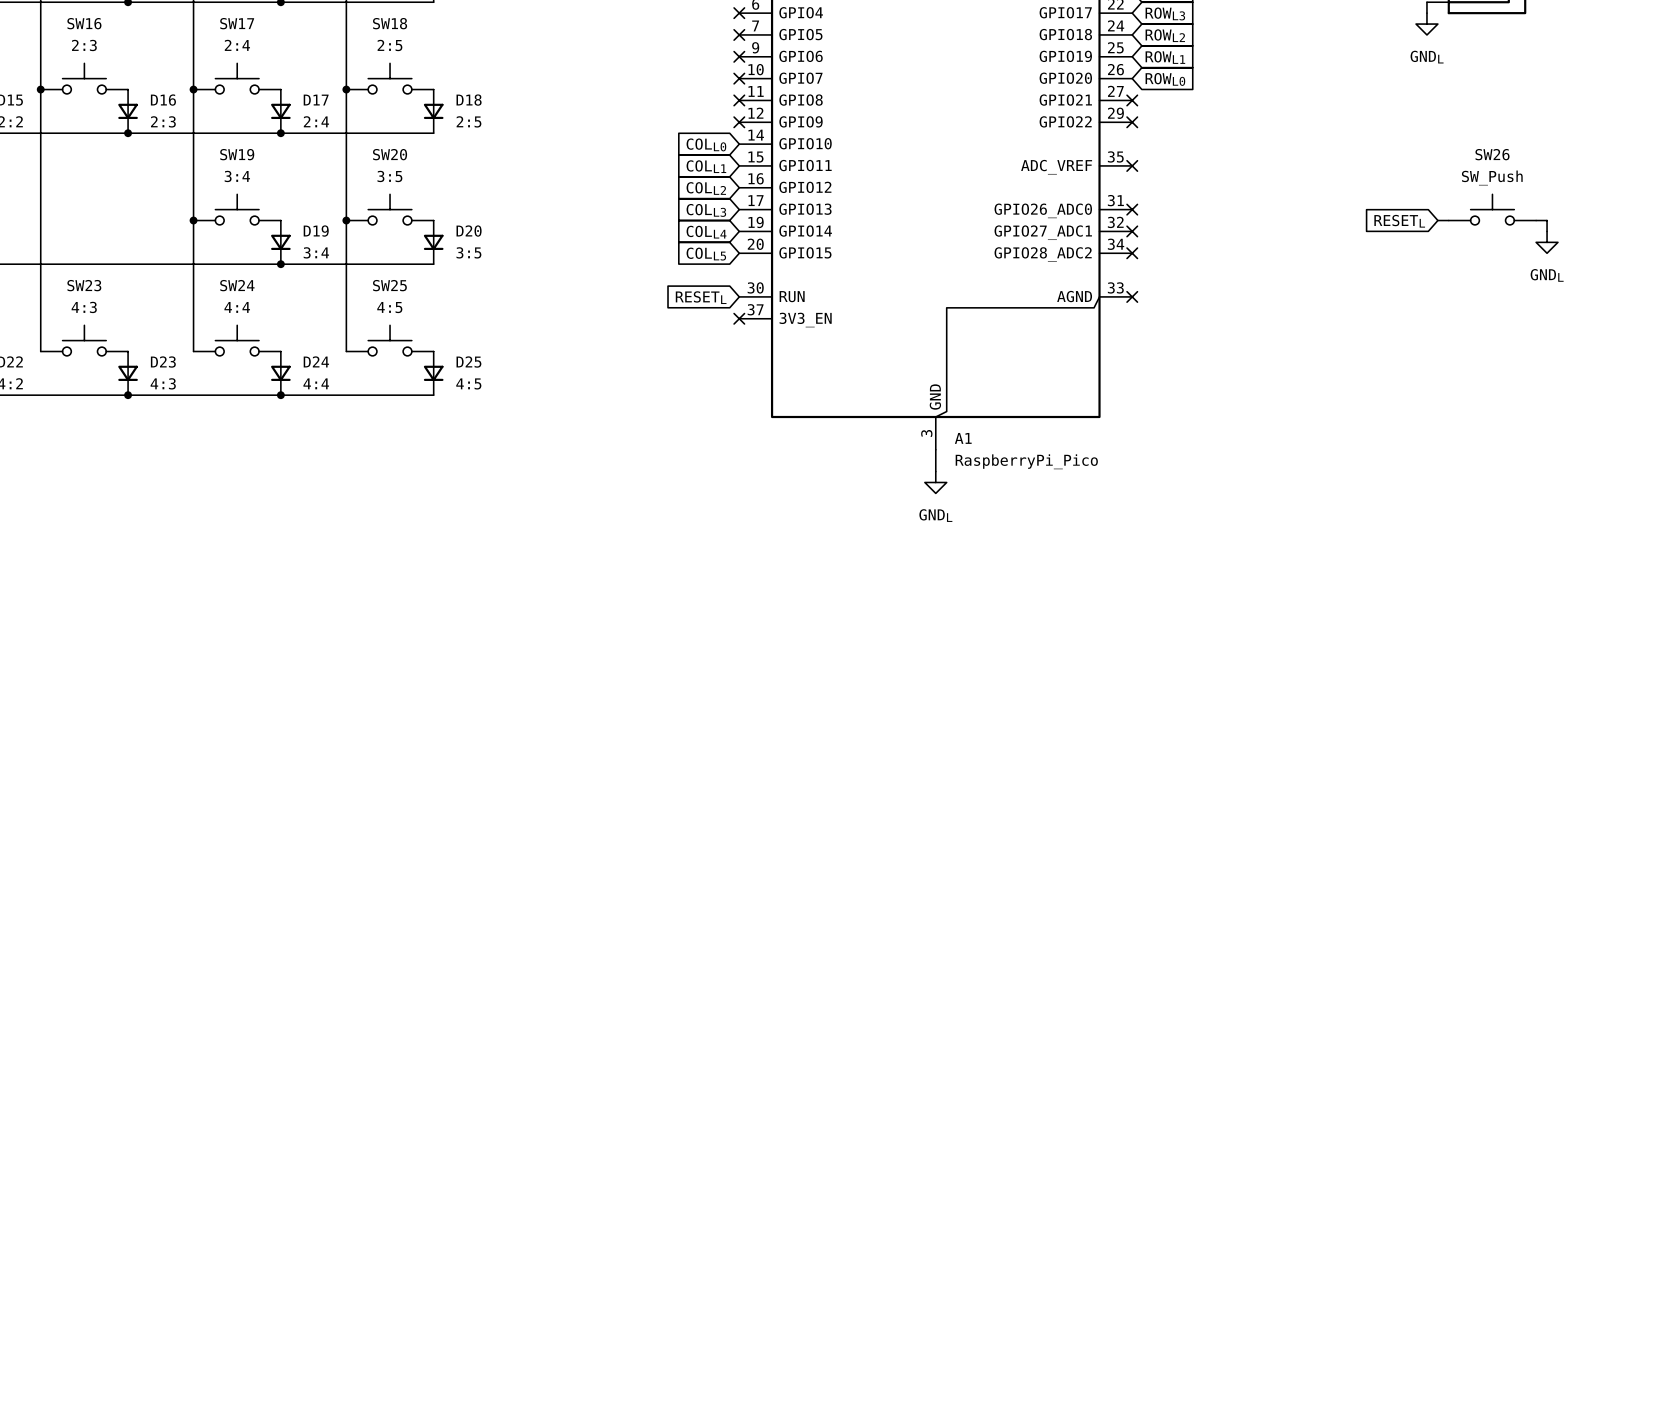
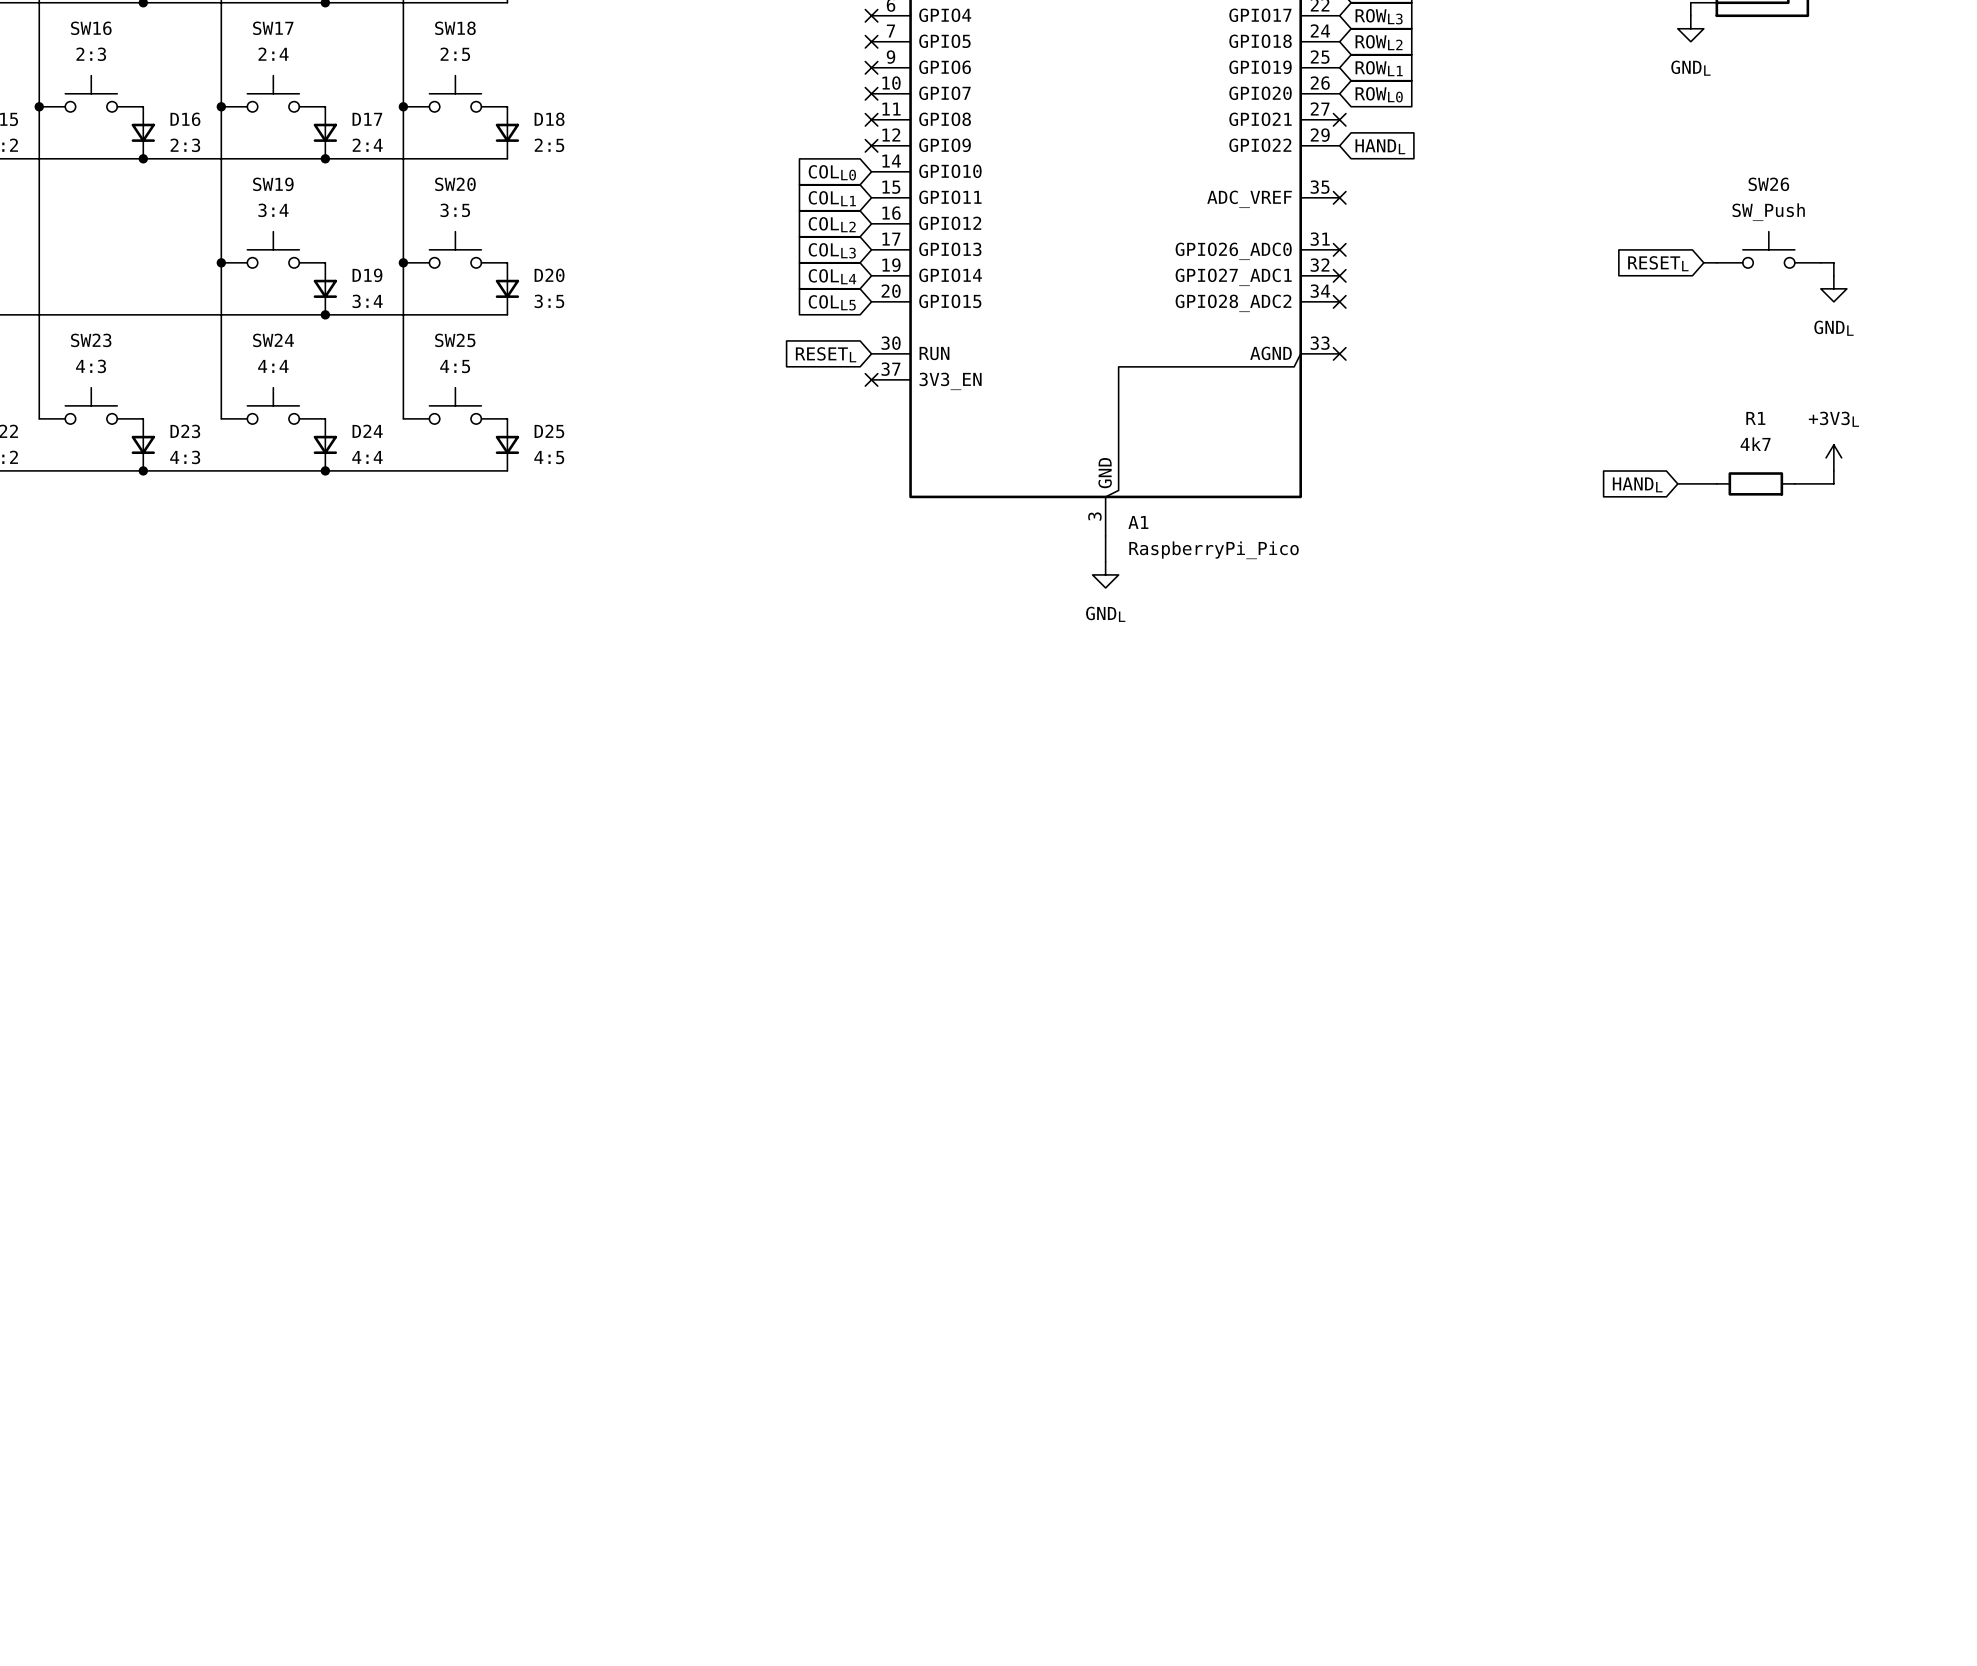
no-connect mark: (1132, 122) -> none
global label: none -> HANDL (1380, 146)
power symbol: none -> +3V3L (1833, 457)
wire: none -> (1833, 470) (1833, 483) (1794, 483)
global label: none -> HANDL (1637, 484)
wire: none -> (1677, 483) (1716, 483)
R1: none -> 4k7 (1755, 483)

